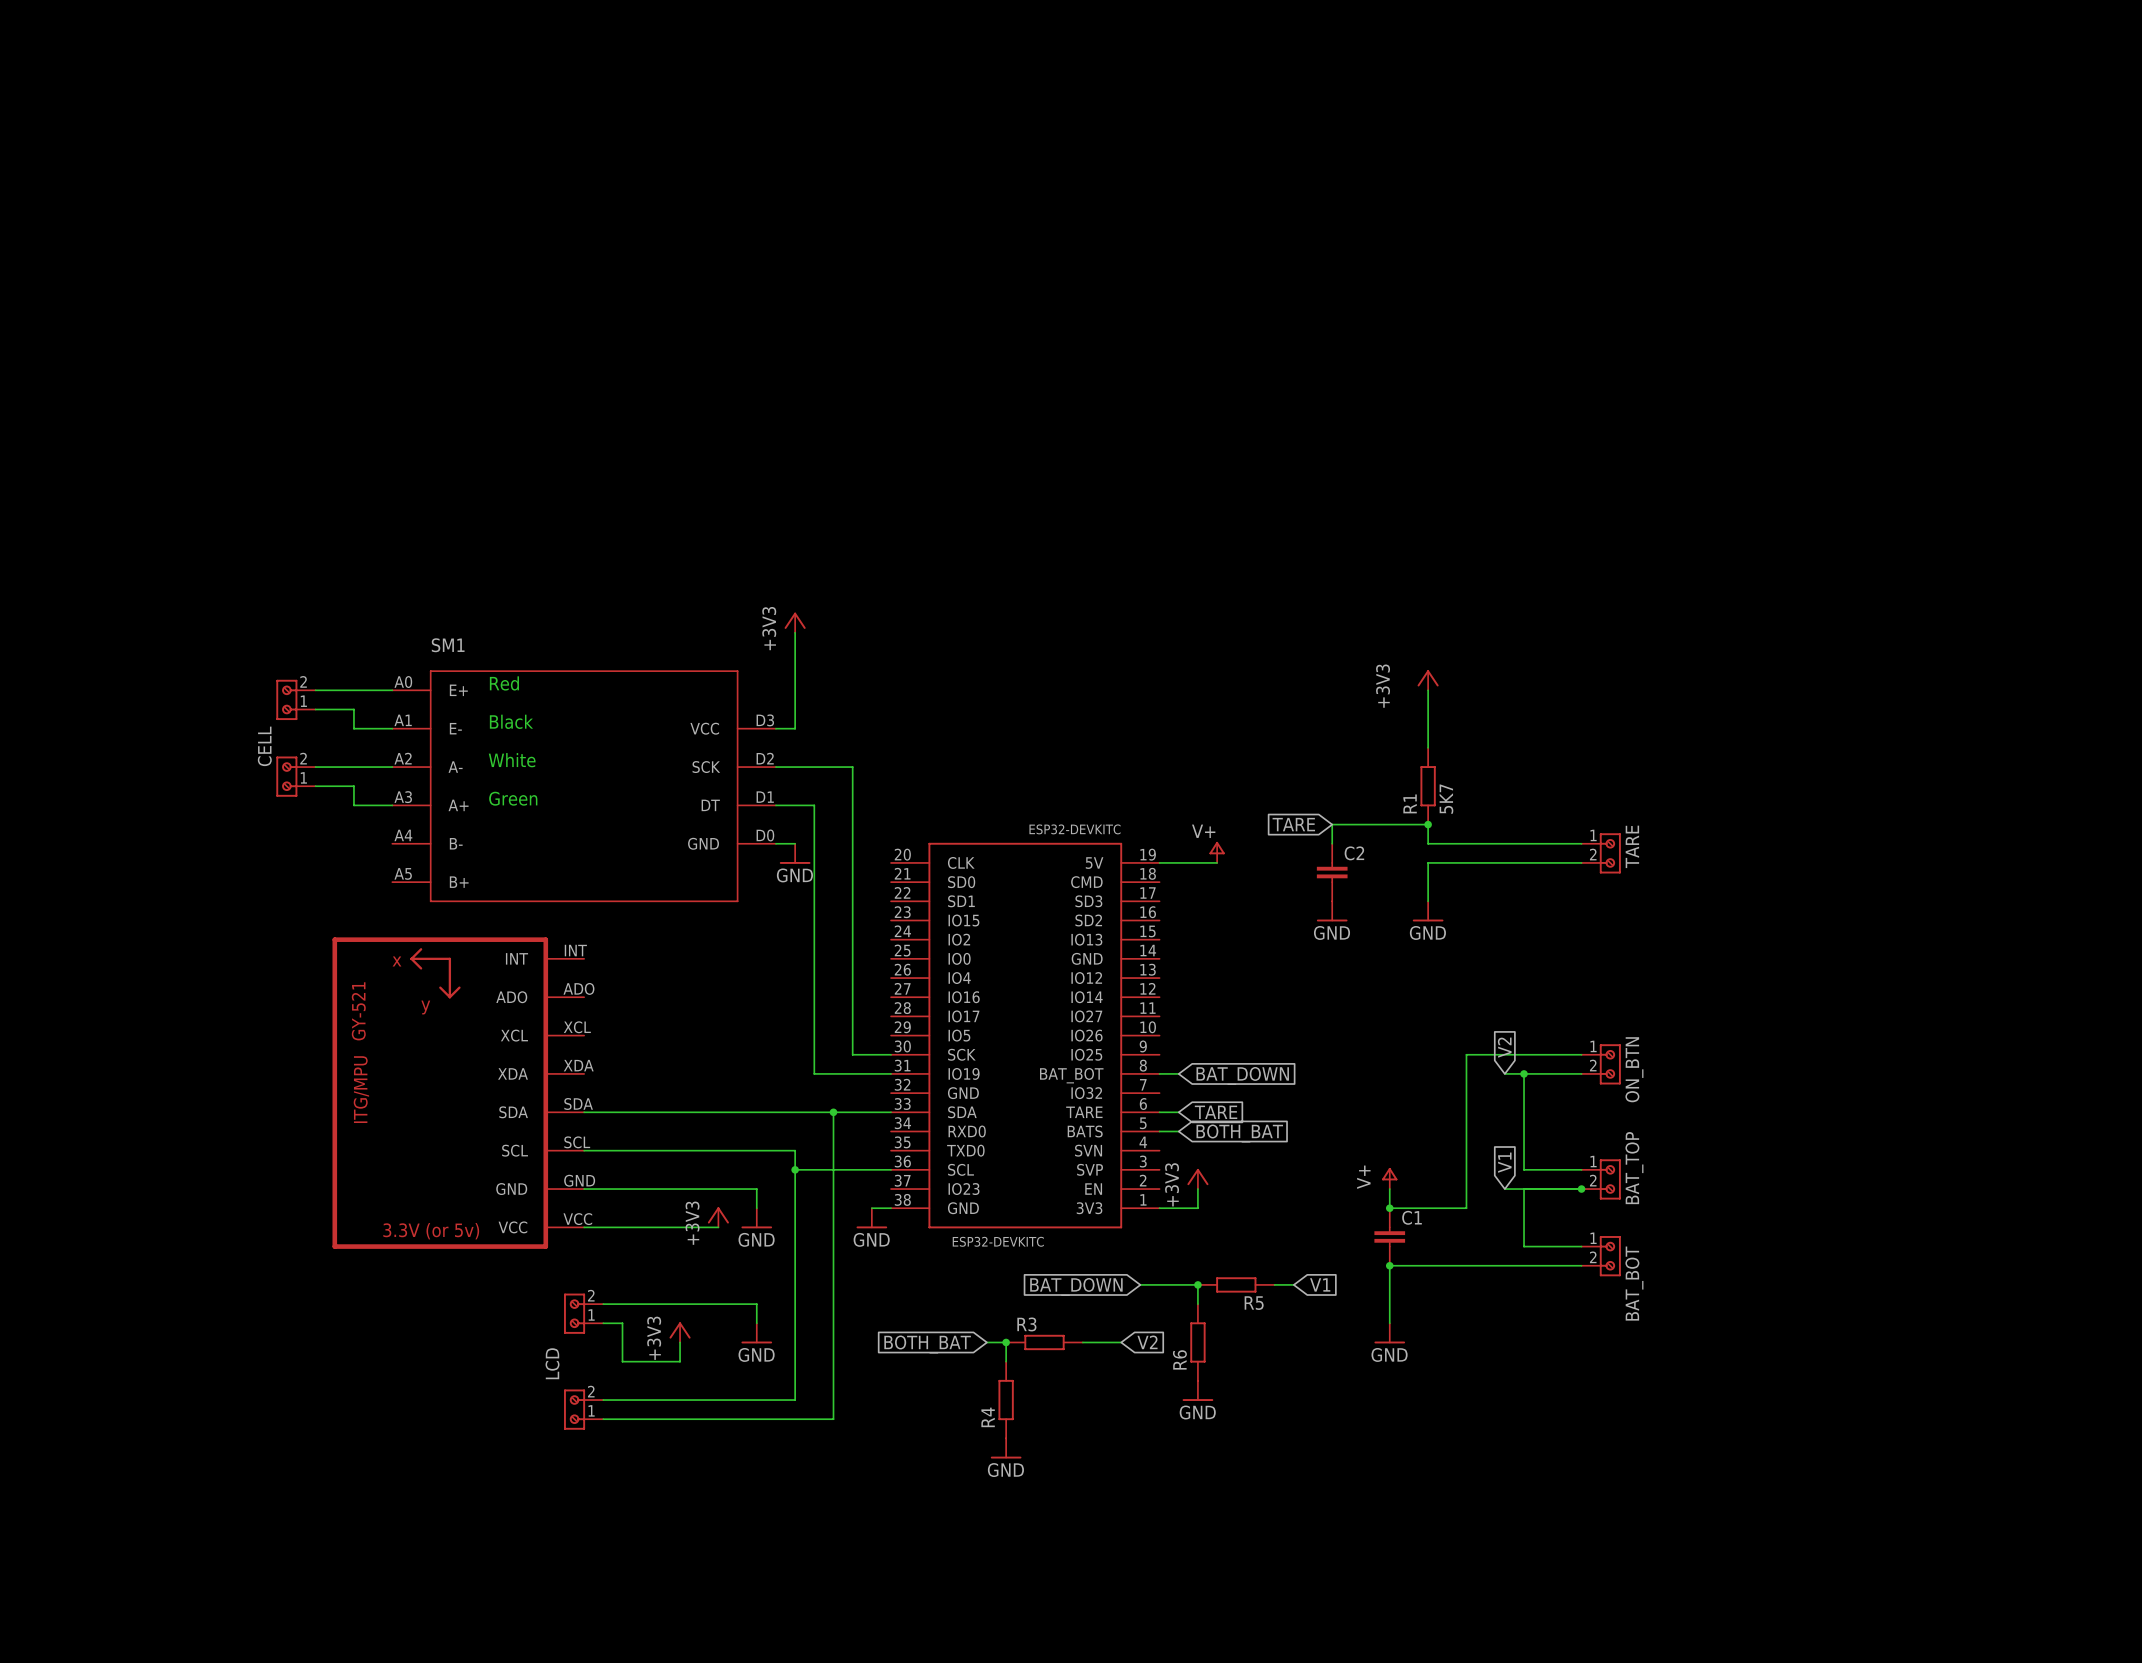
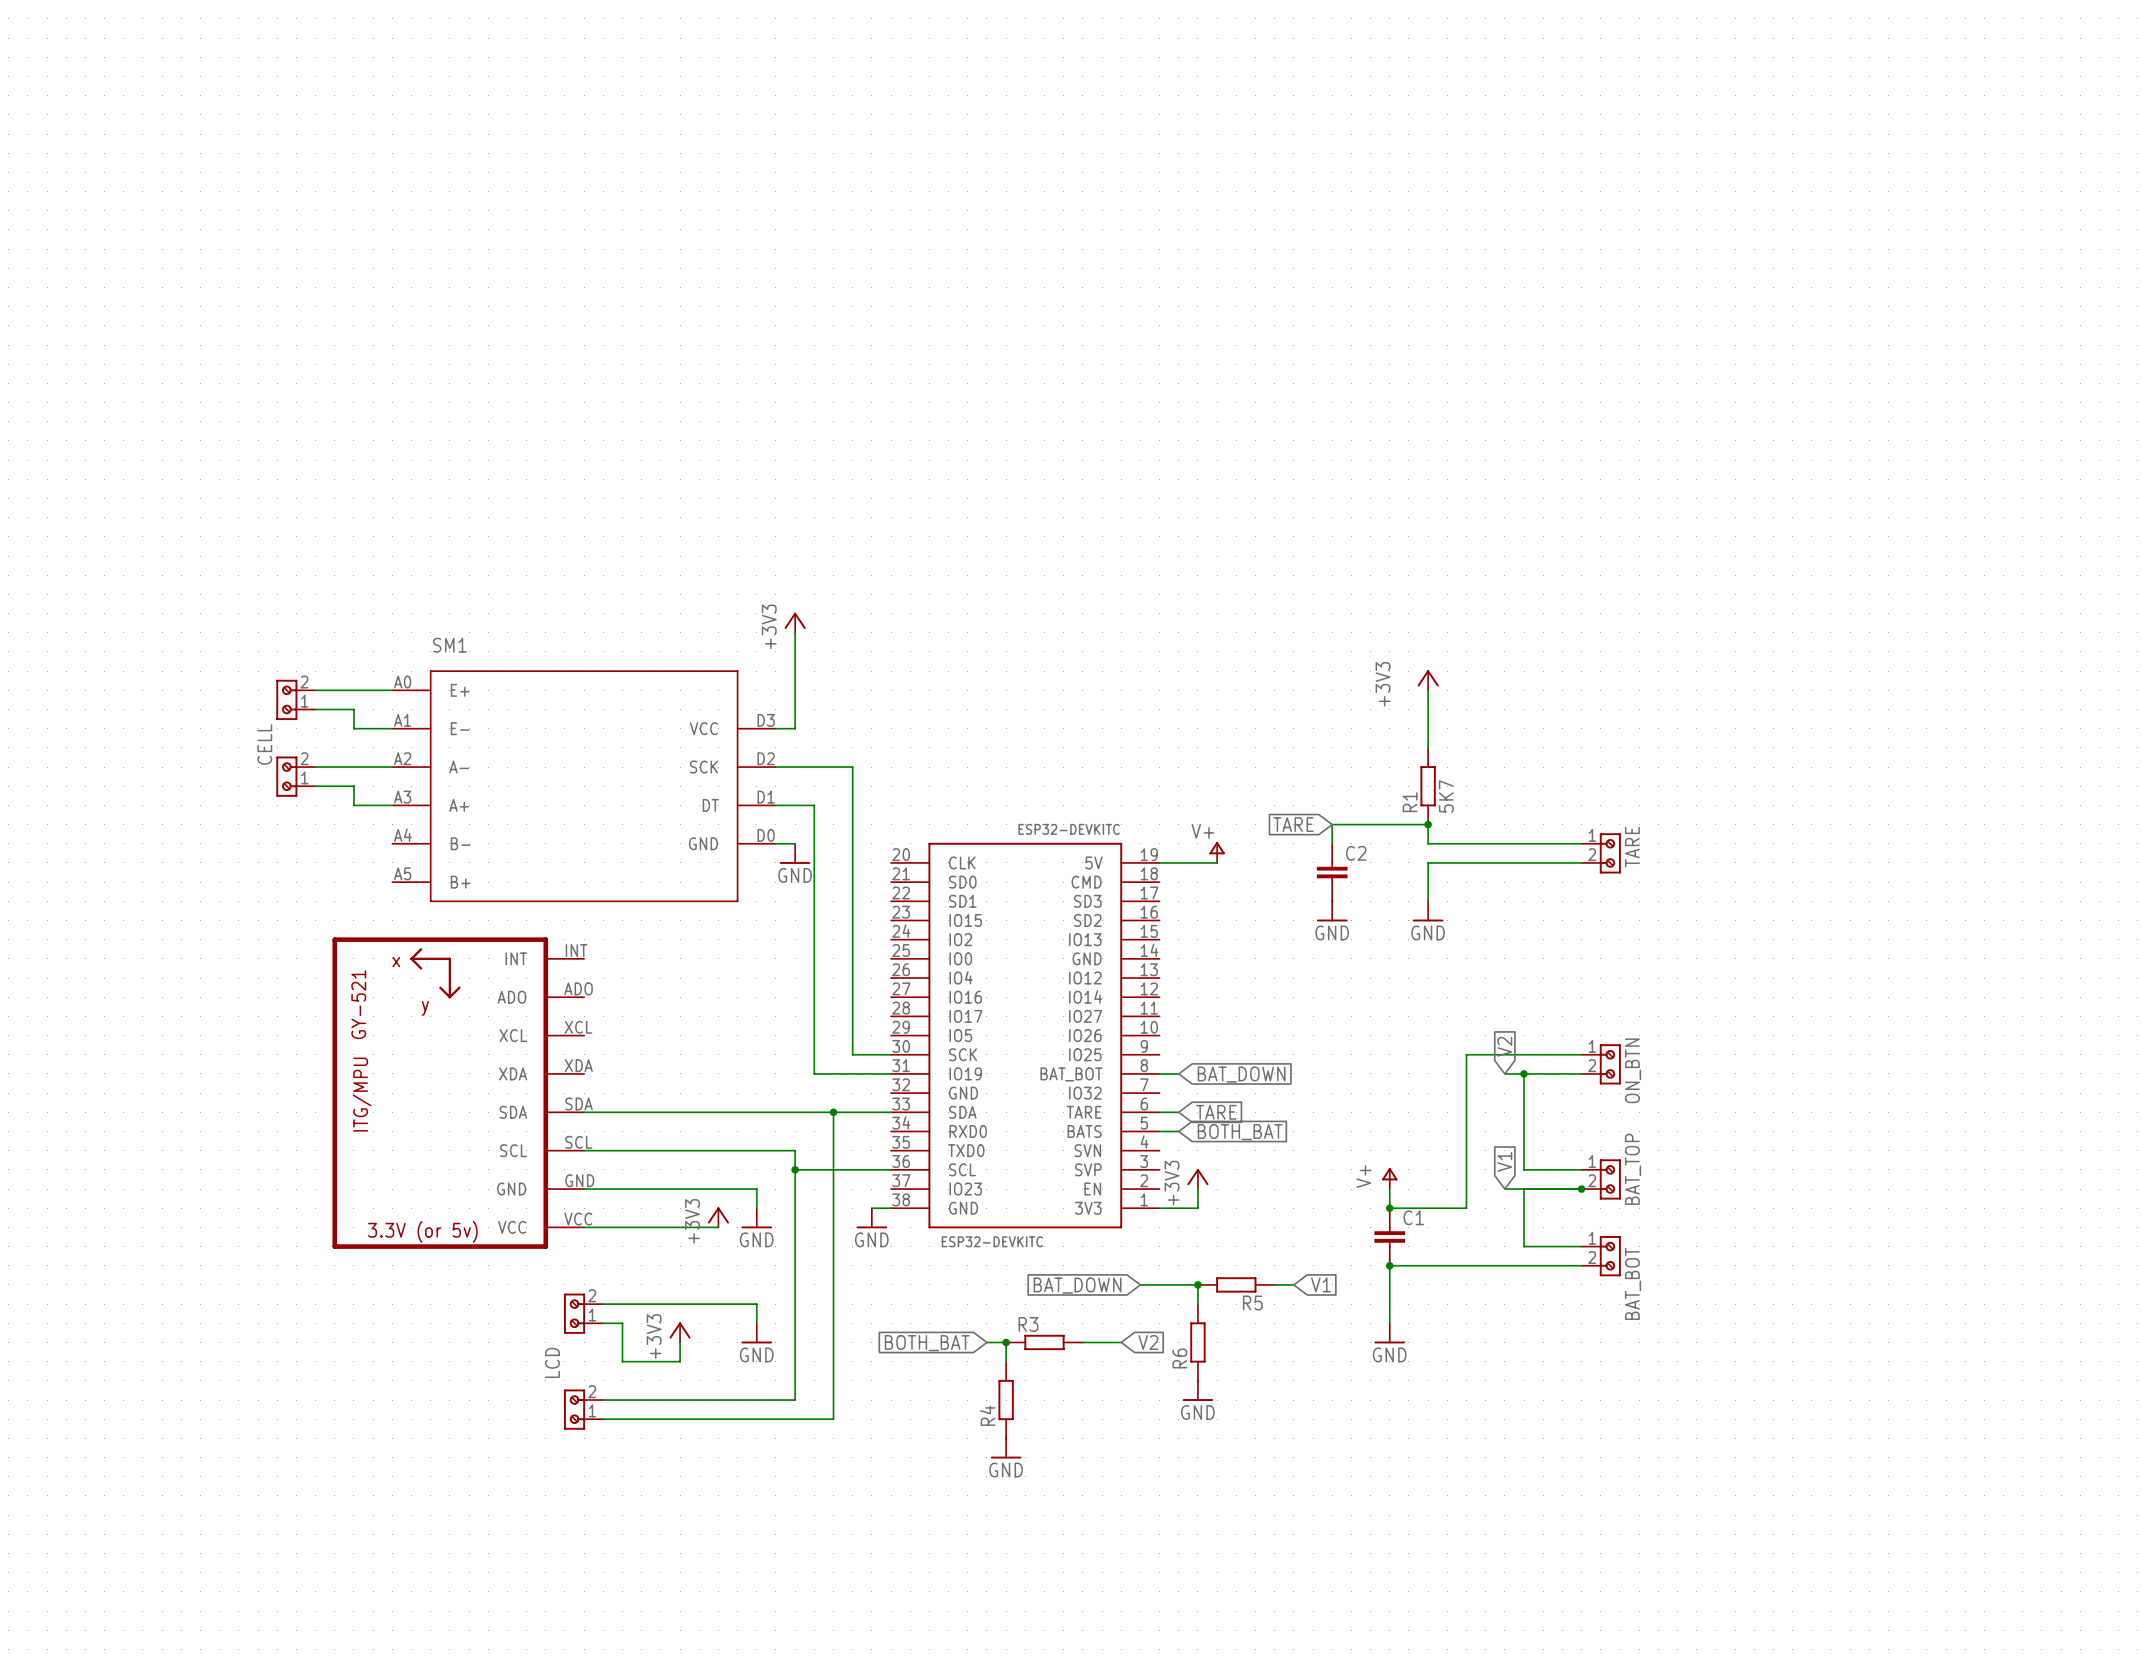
text: Red (504, 683) -> none
text: Black (511, 721) -> none
text: White (512, 760) -> none
text: Green (513, 798) -> none

